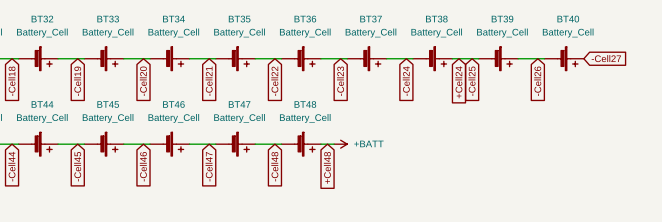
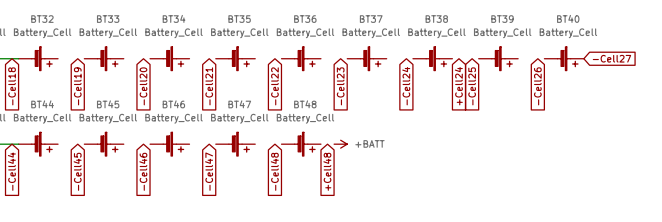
wire: (58, 58) (84, 58) -> none
wire: (123, 58) (150, 58) -> none
wire: (189, 58) (215, 58) -> none
wire: (255, 58) (281, 58) -> none
wire: (320, 58) (347, 58) -> none
wire: (386, 58) (412, 58) -> none
wire: (452, 58) (478, 58) -> none
wire: (518, 58) (544, 58) -> none
wire: (58, 144) (84, 144) -> none
wire: (123, 144) (150, 144) -> none
wire: (189, 144) (215, 144) -> none
wire: (255, 144) (281, 144) -> none
wire: (320, 144) (334, 144) -> none

